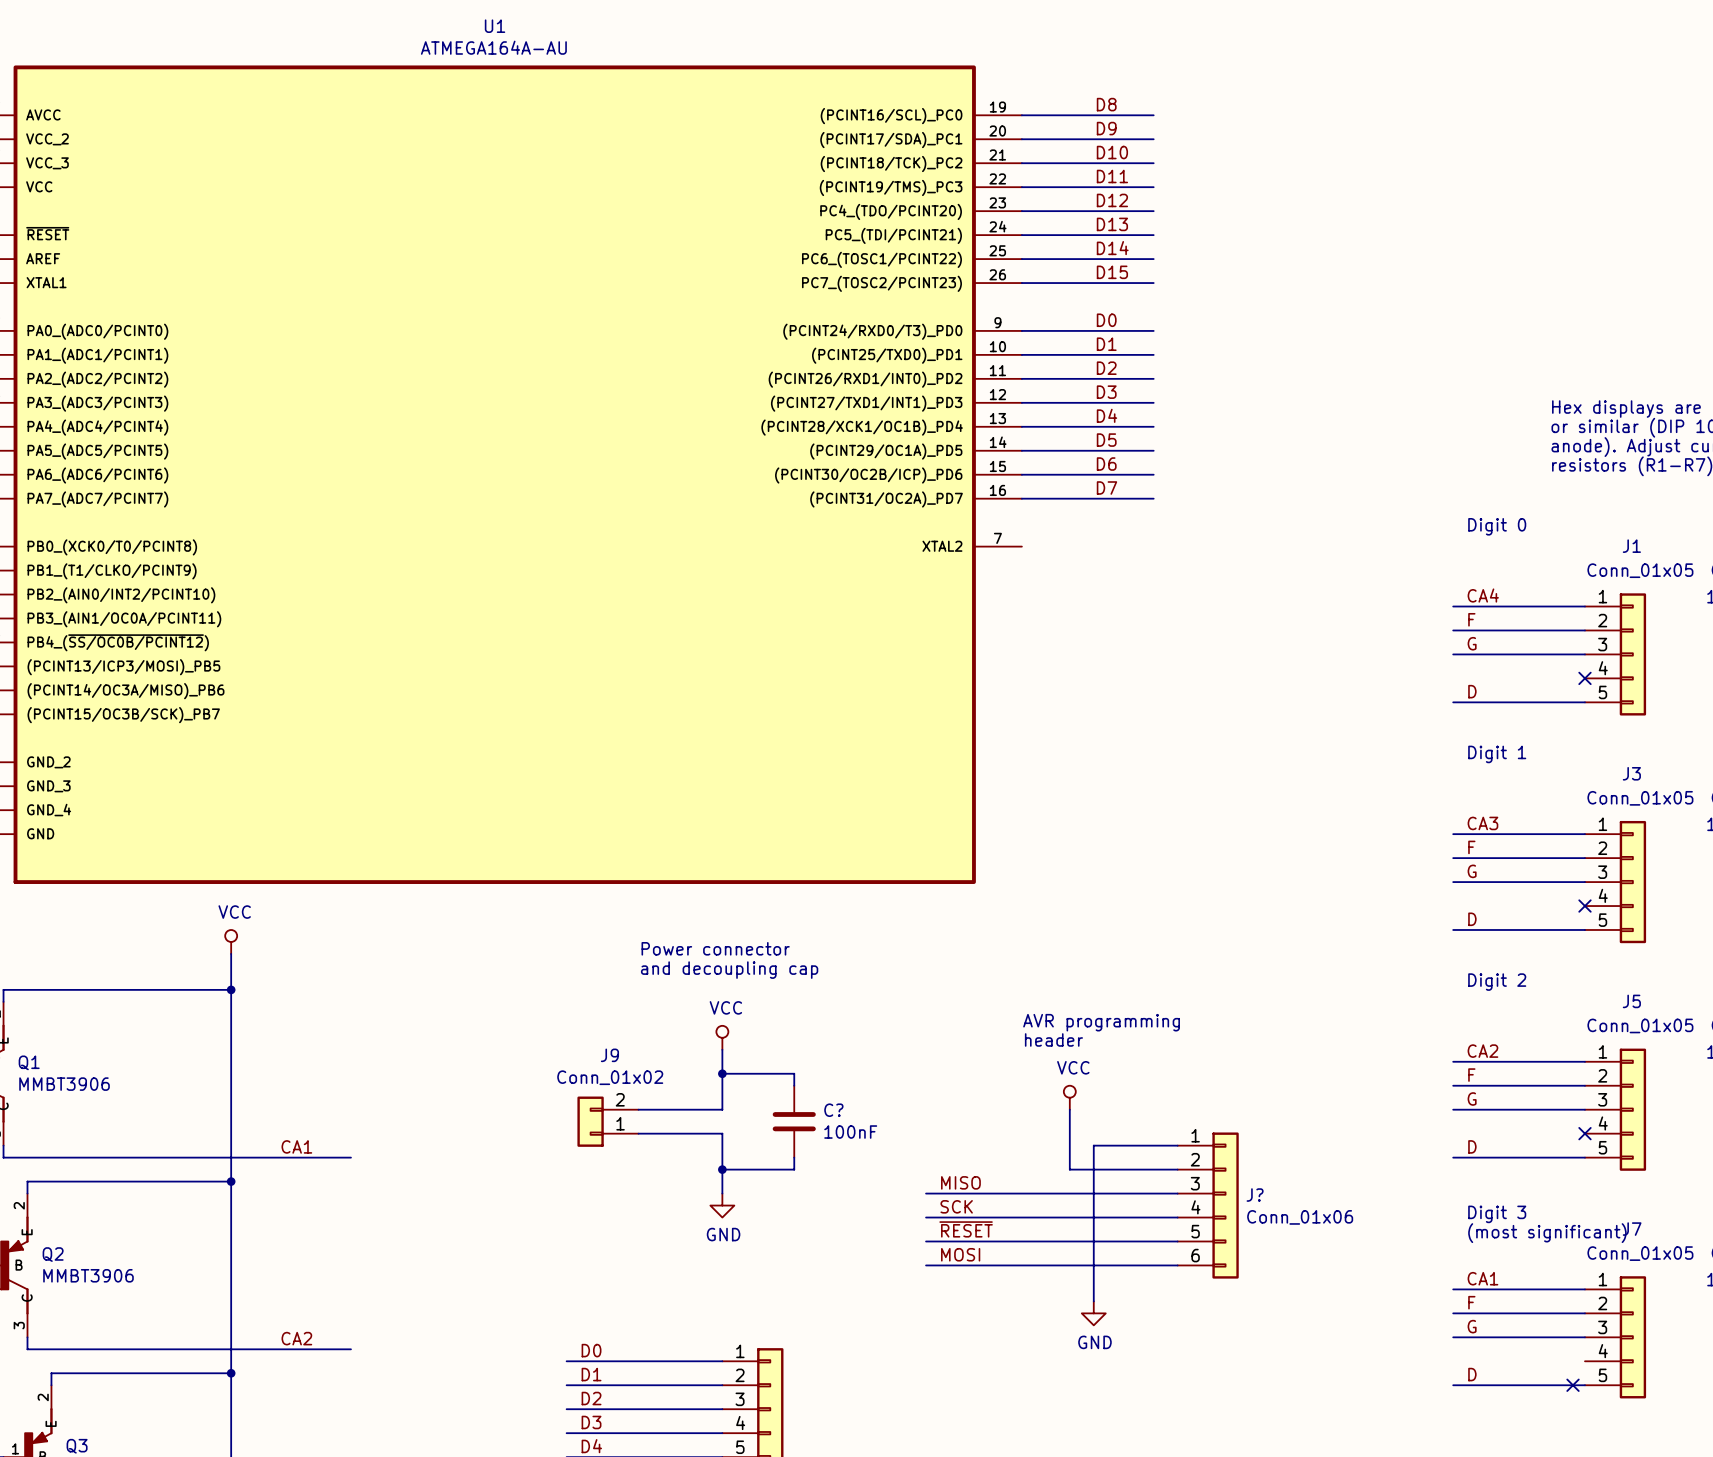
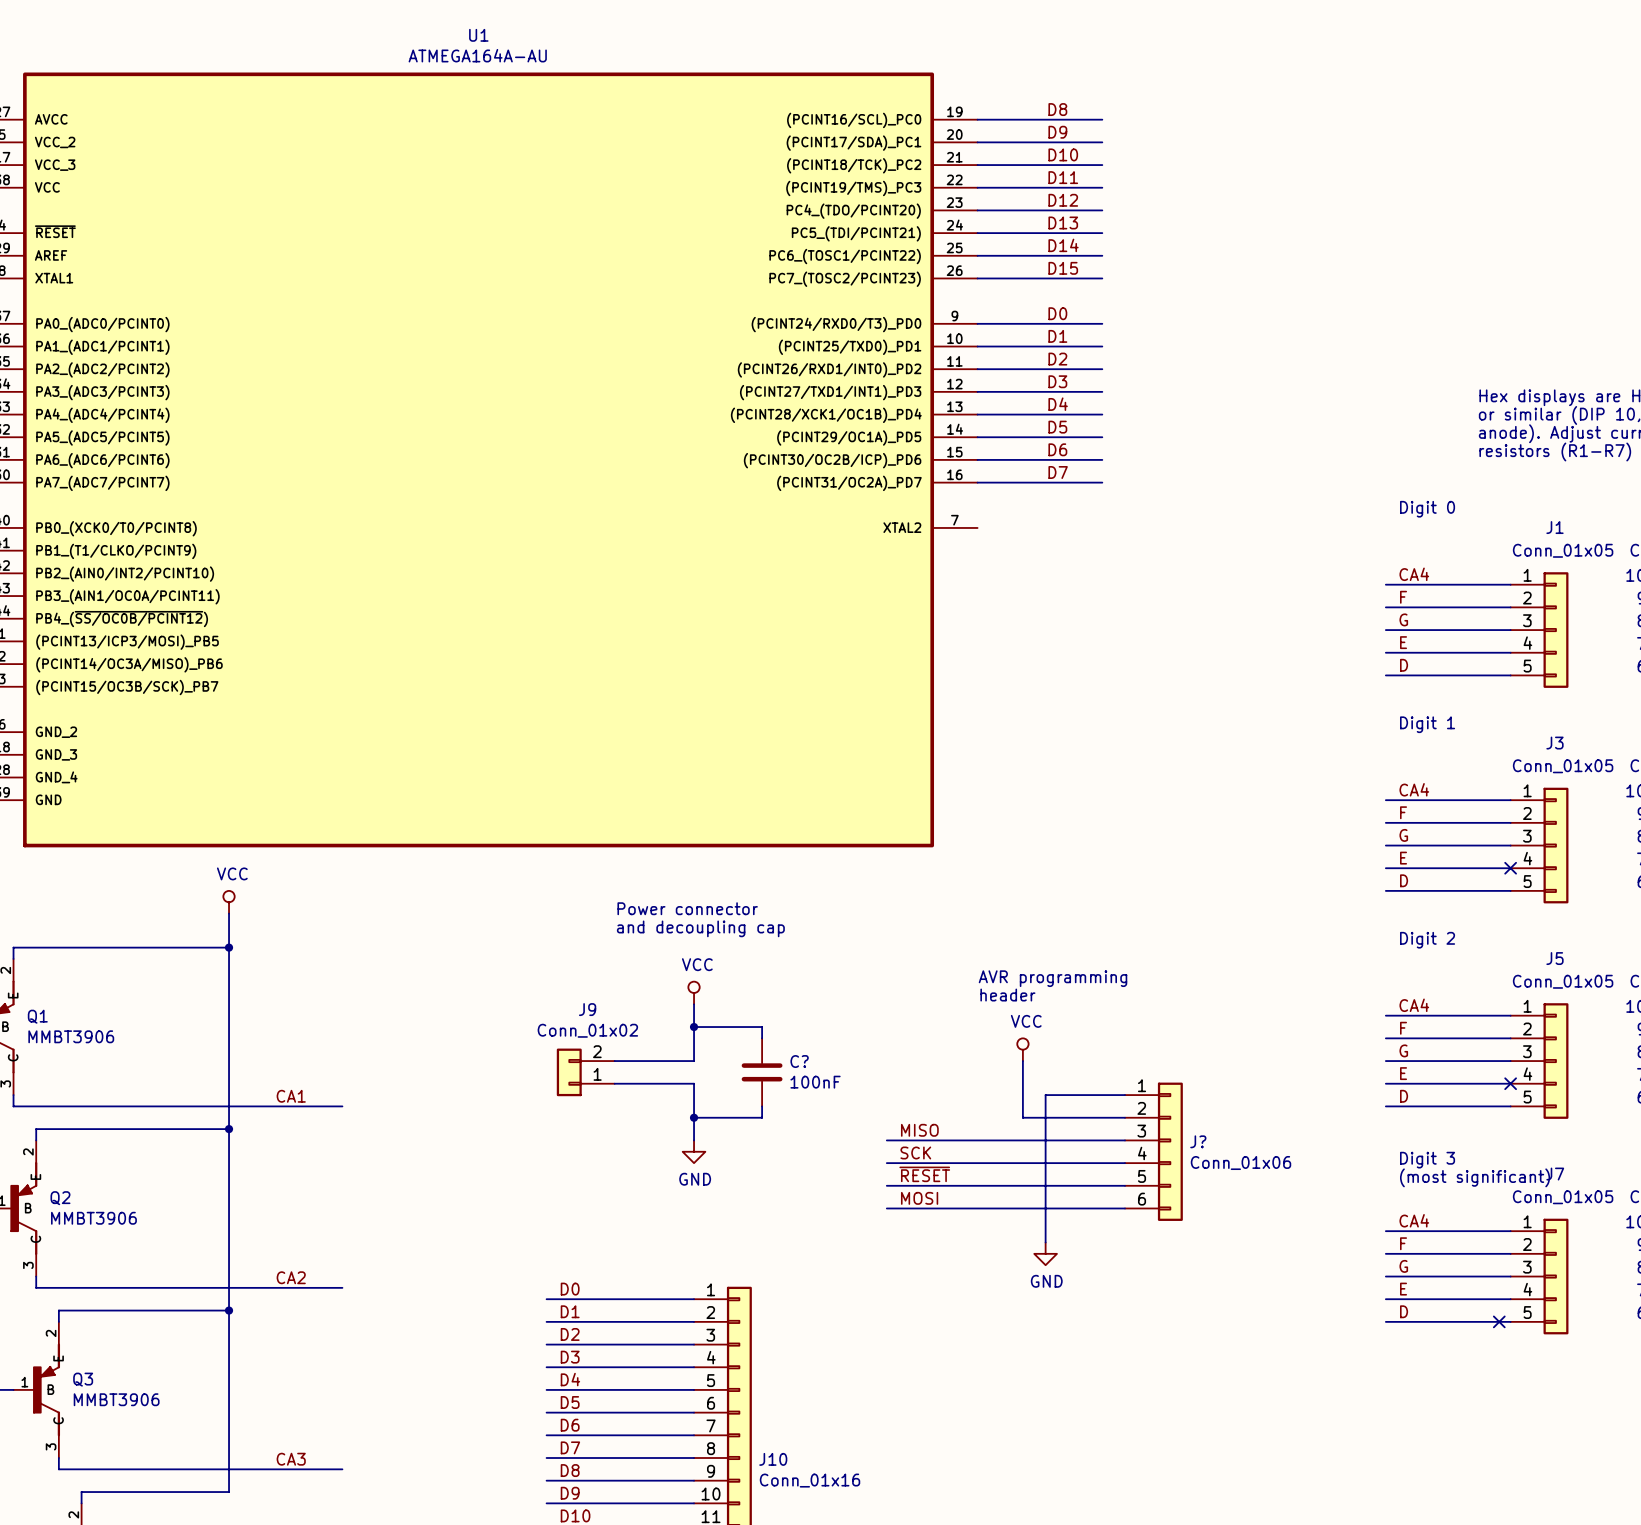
label: none -> E (1403, 642)
wire: none -> (1385, 652) (1510, 652)
no-connect mark: (1584, 678) -> none
label: CA3 (1482, 823) -> CA4 (1414, 789)
label: none -> E (1403, 858)
wire: none -> (1385, 868) (1510, 868)
label: CA2 (1482, 1051) -> CA4 (1414, 1005)
label: none -> E (1403, 1073)
wire: none -> (1385, 1083) (1510, 1083)
label: CA1 (1482, 1278) -> CA4 (1414, 1220)
label: none -> E (1403, 1289)
wire: none -> (1385, 1299) (1510, 1299)

